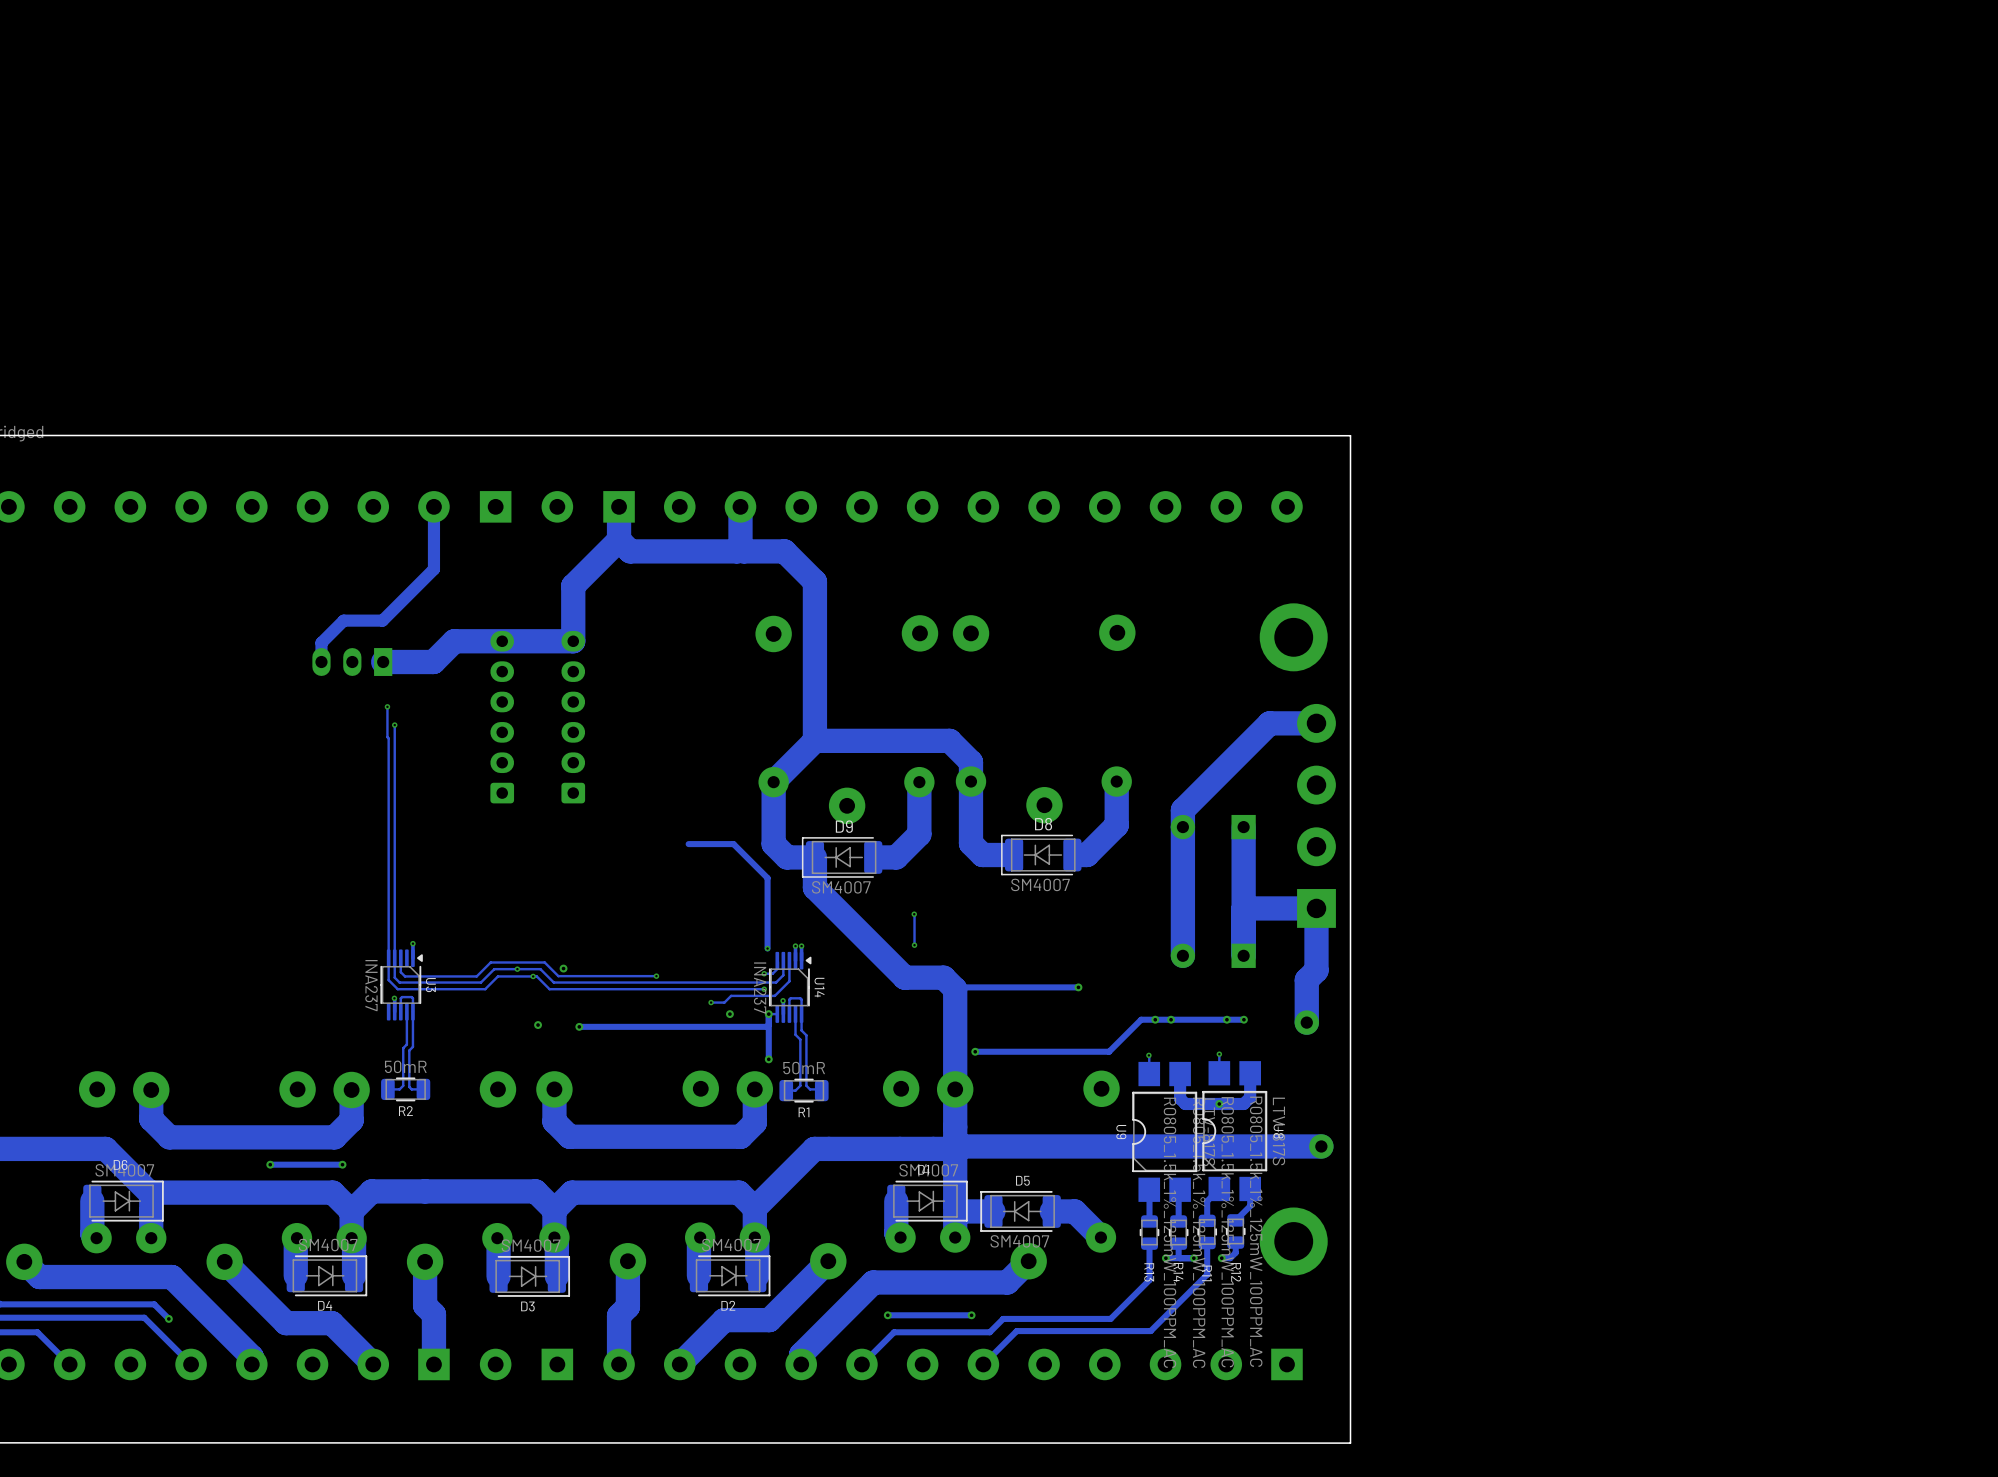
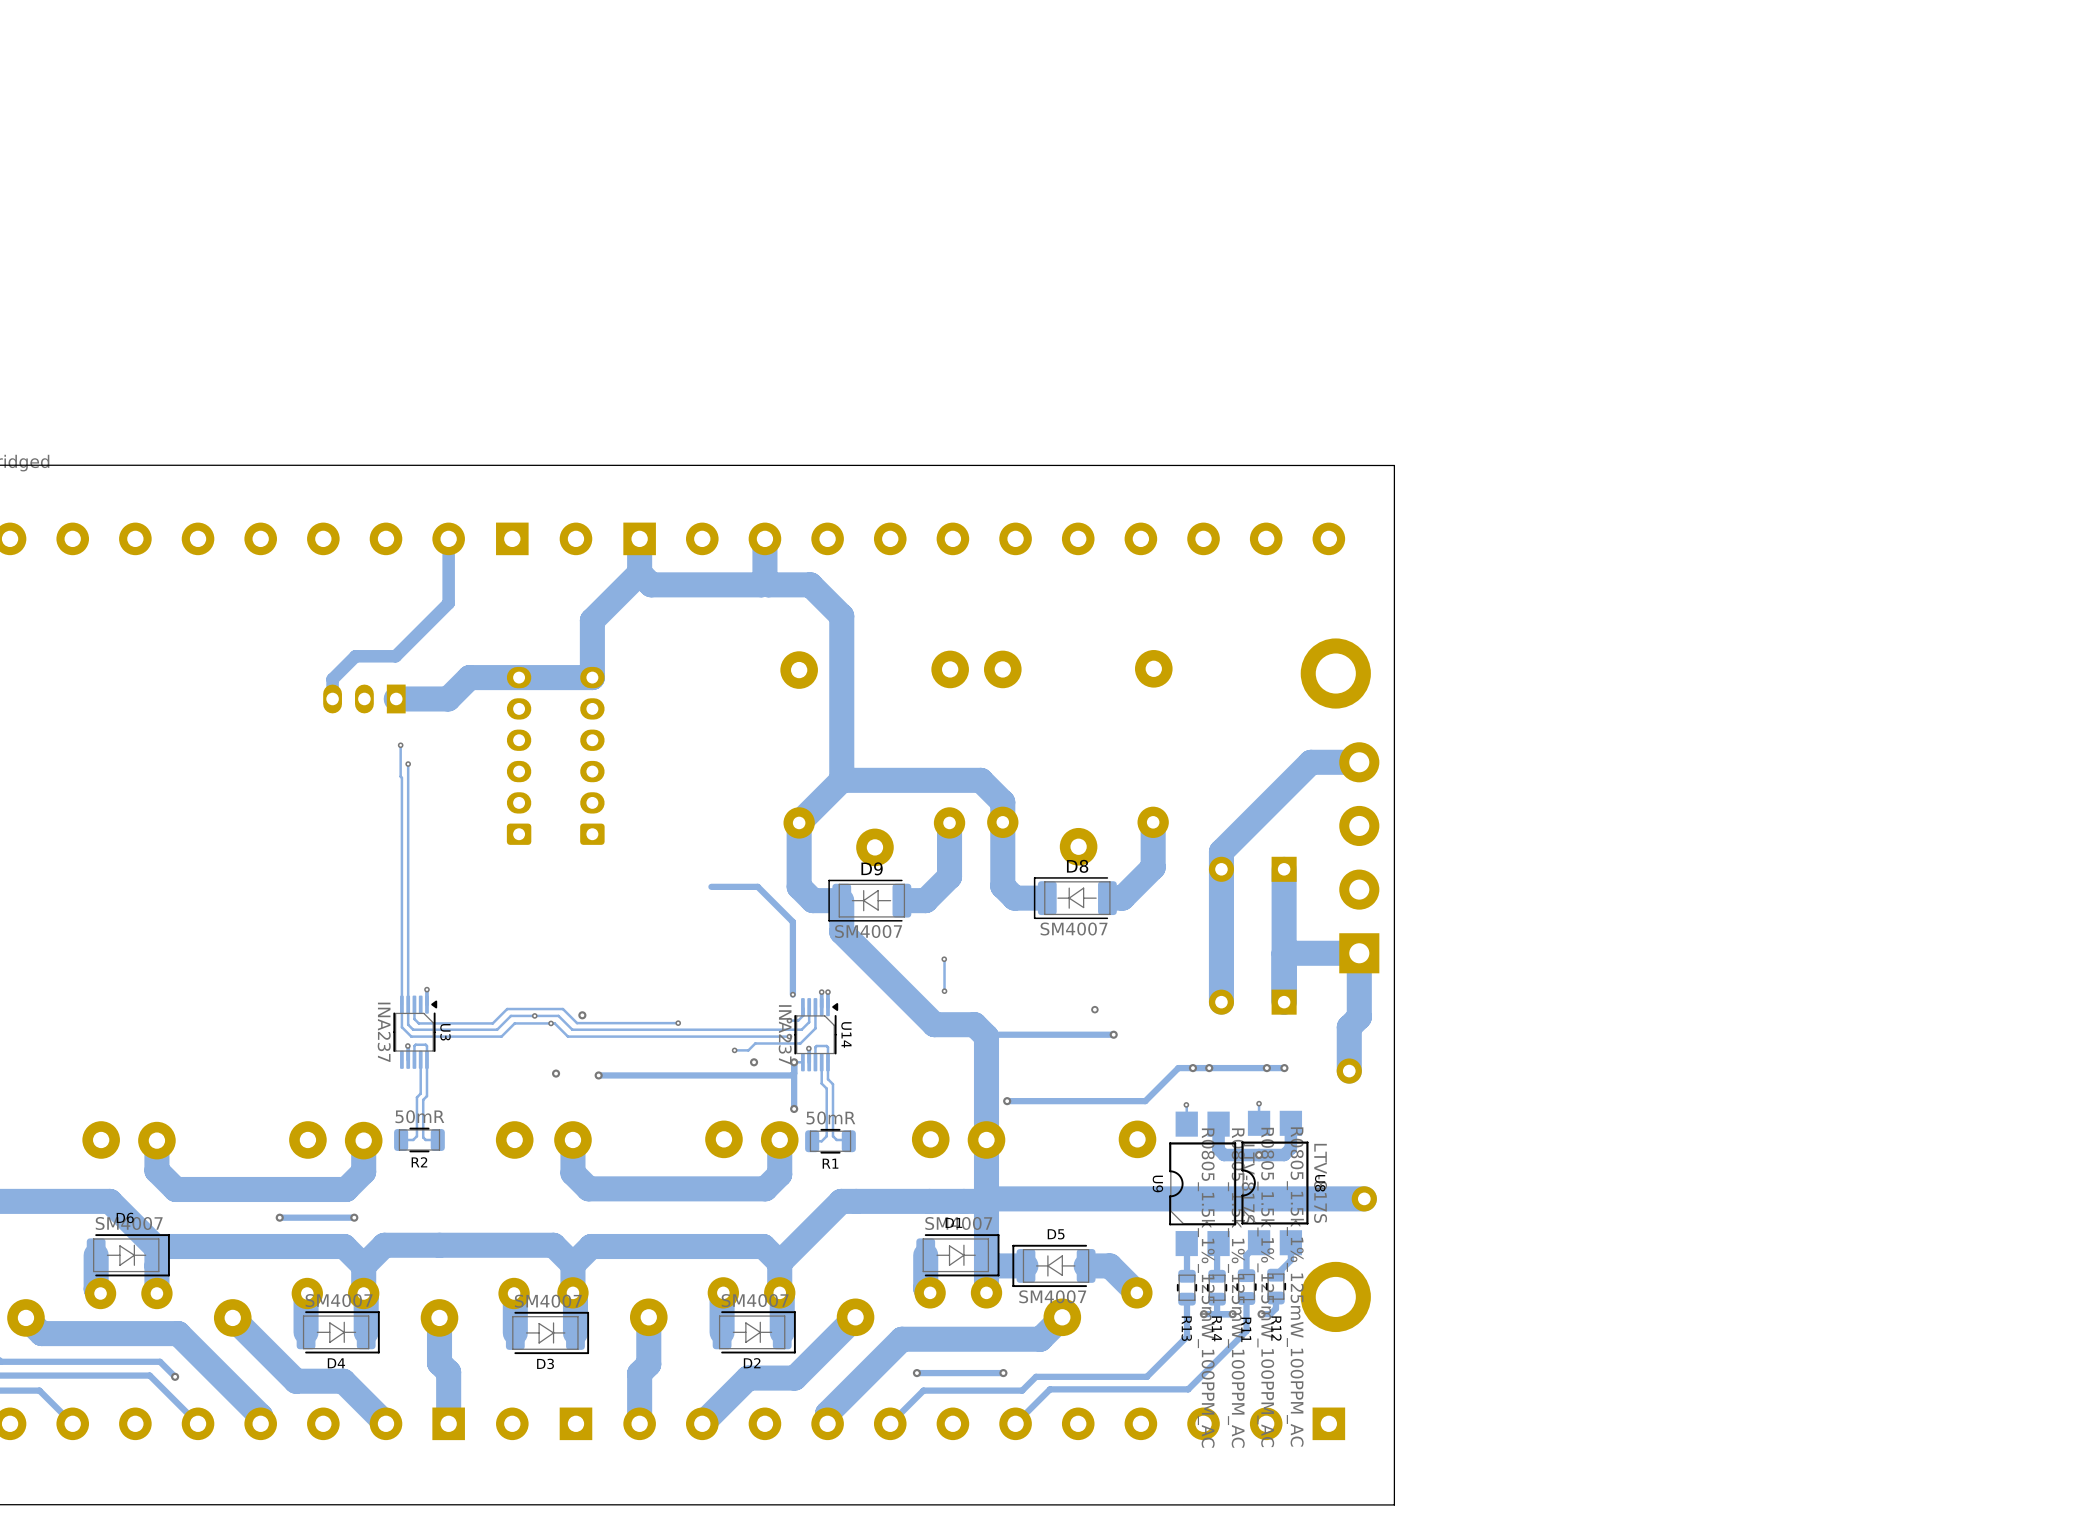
via: none -> (1094, 1009)

